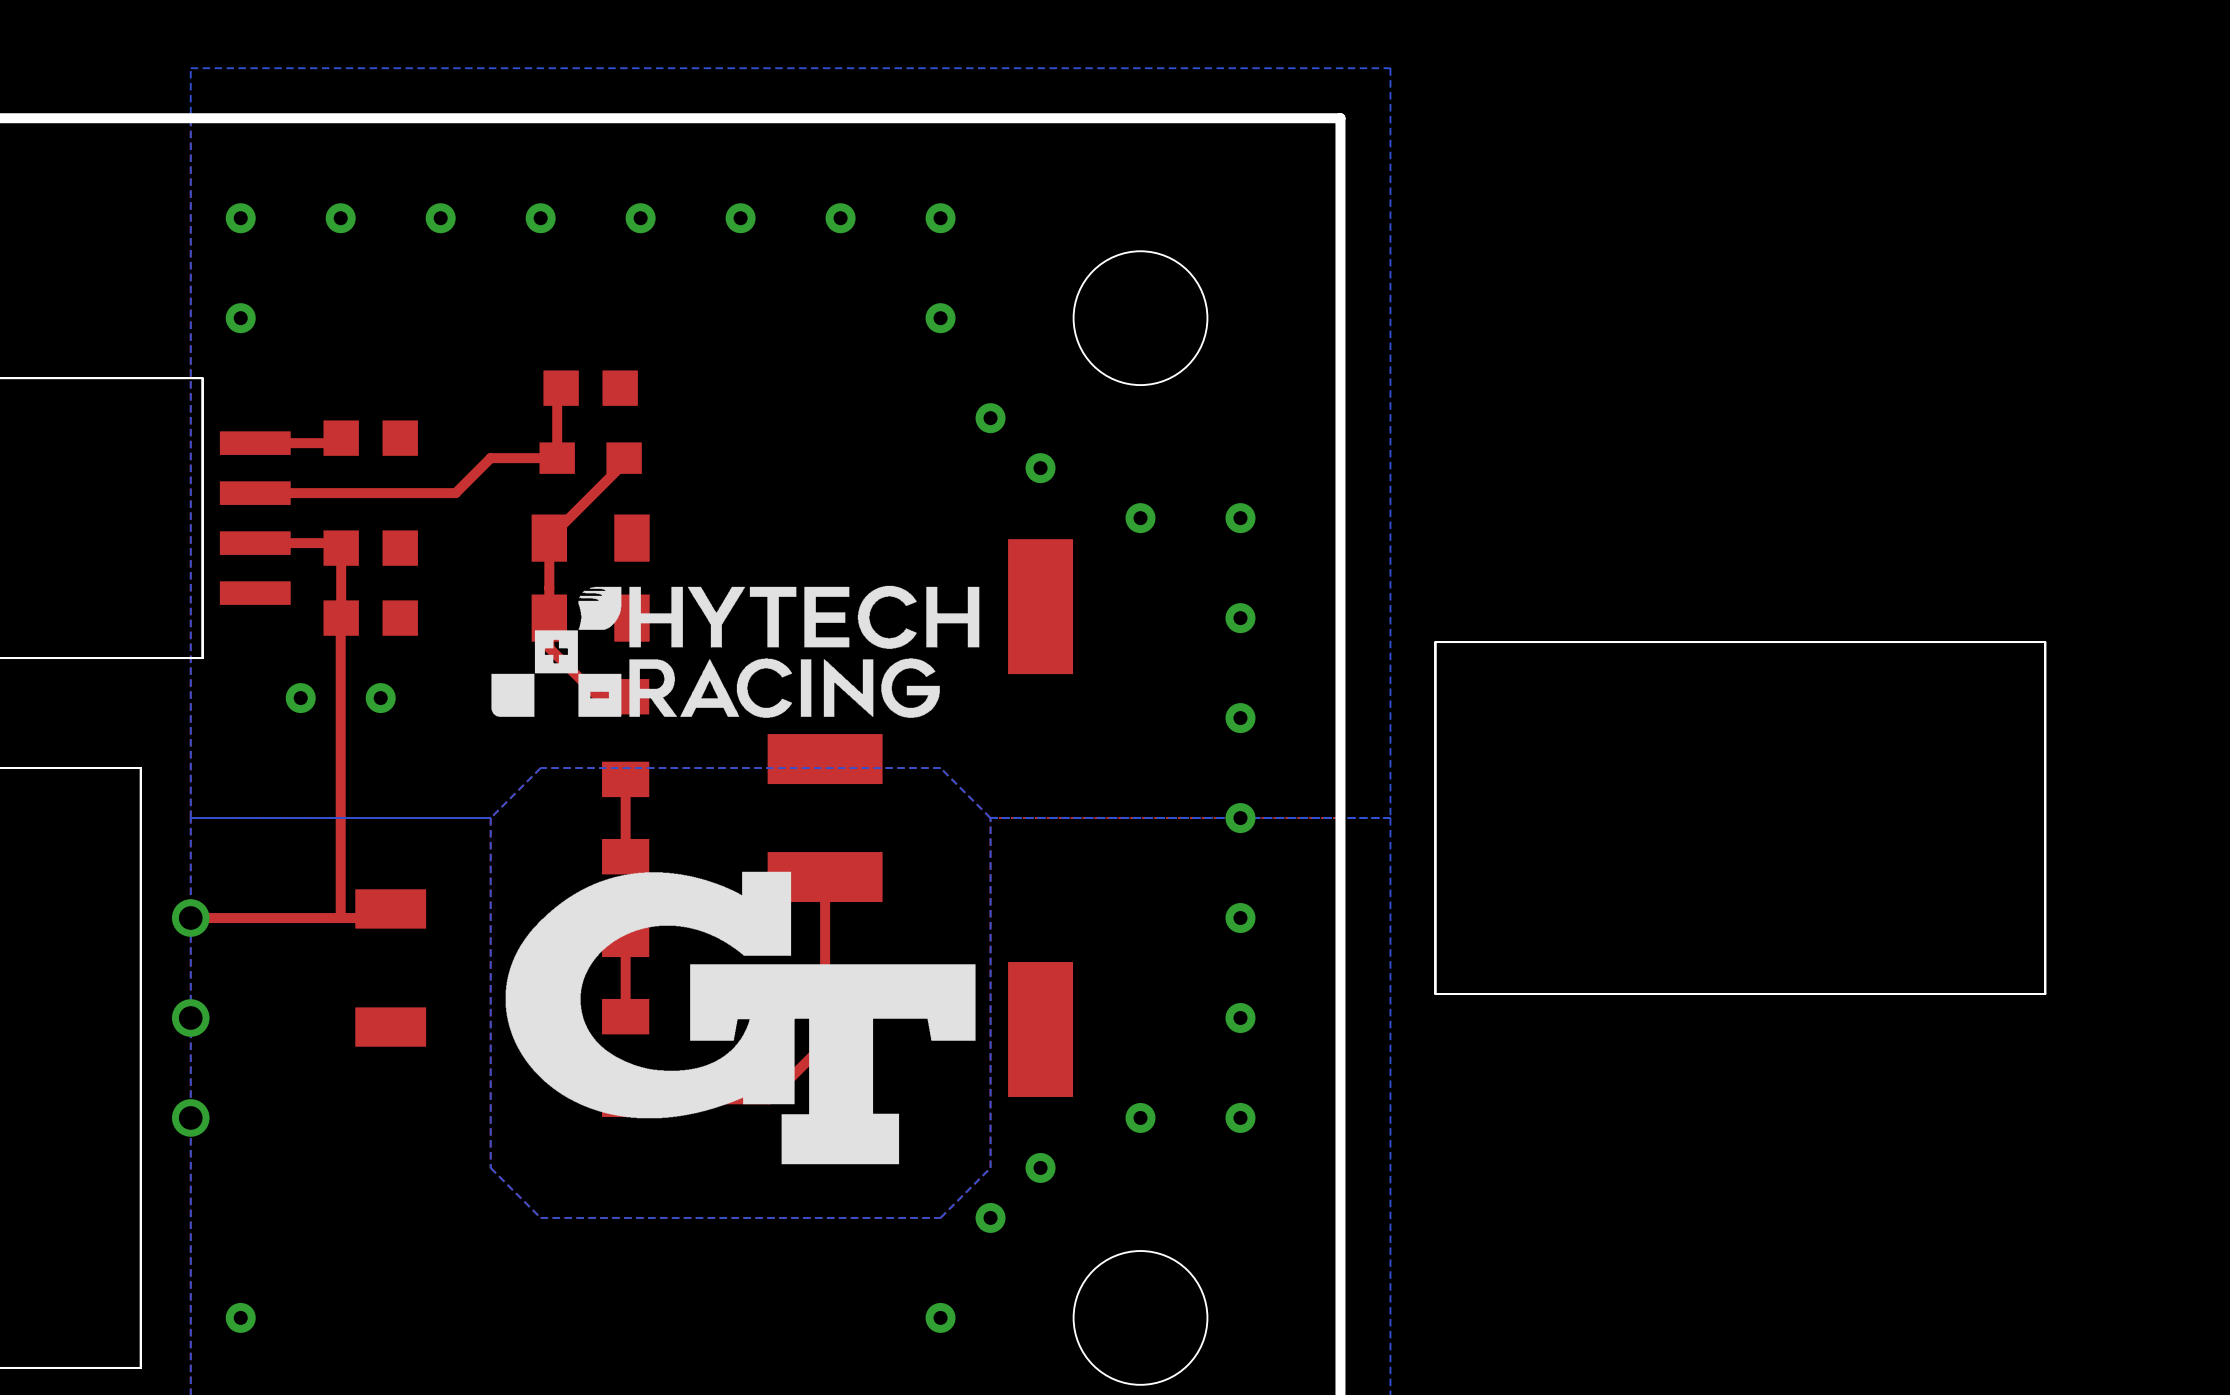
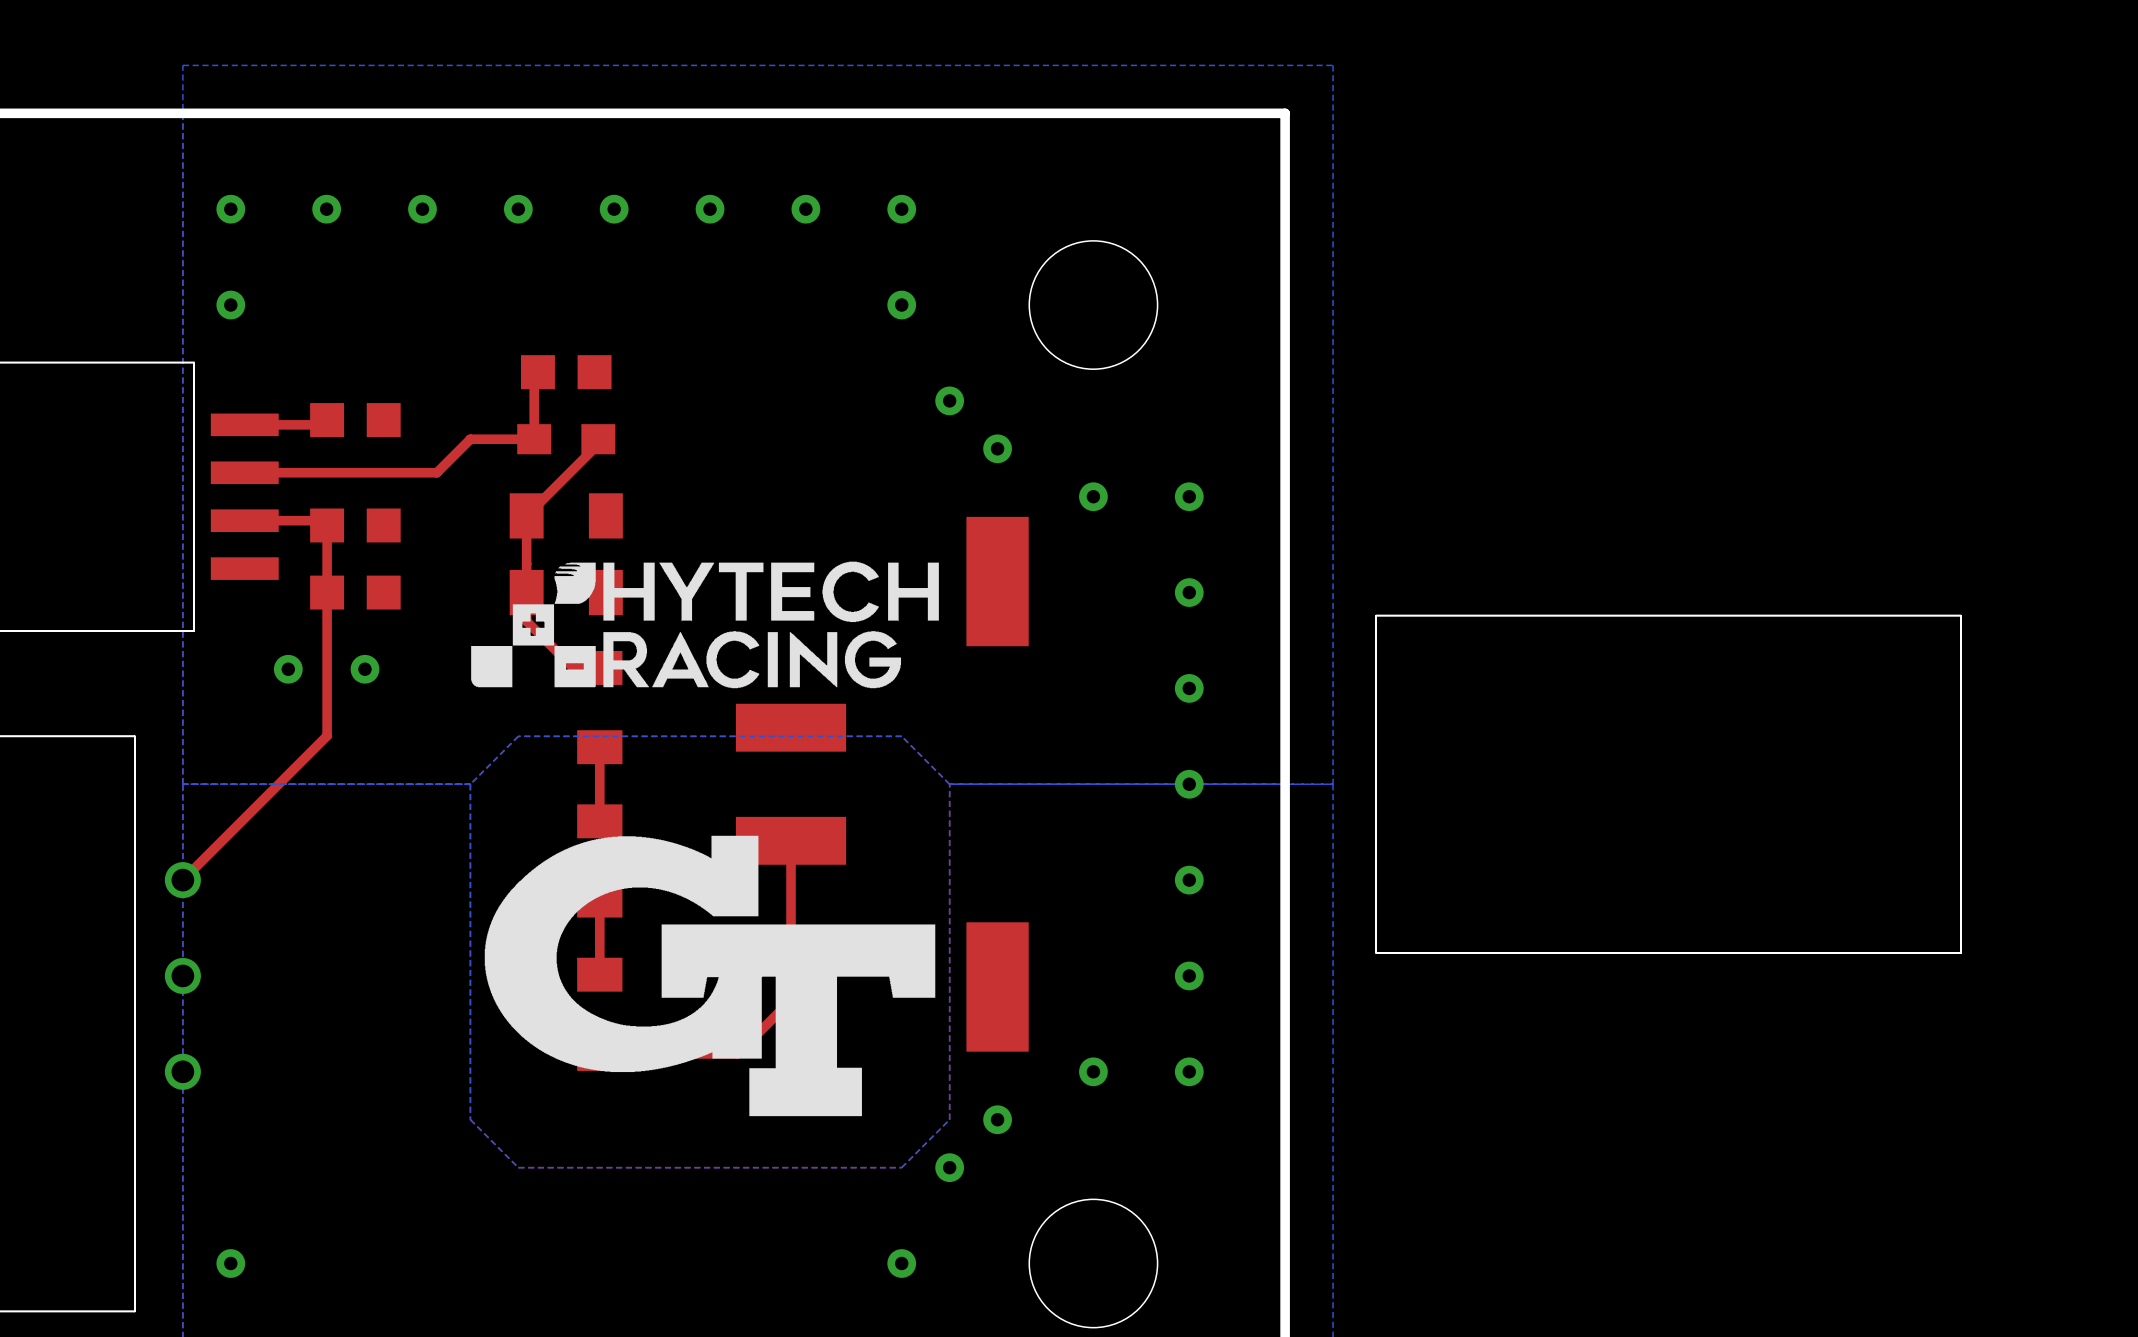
top track: (340, 618) (340, 918) -> (327, 592) (327, 735) (182, 880)
top track: (390, 908) (381, 918) (190, 918) -> none
part: (390, 968) -> none

